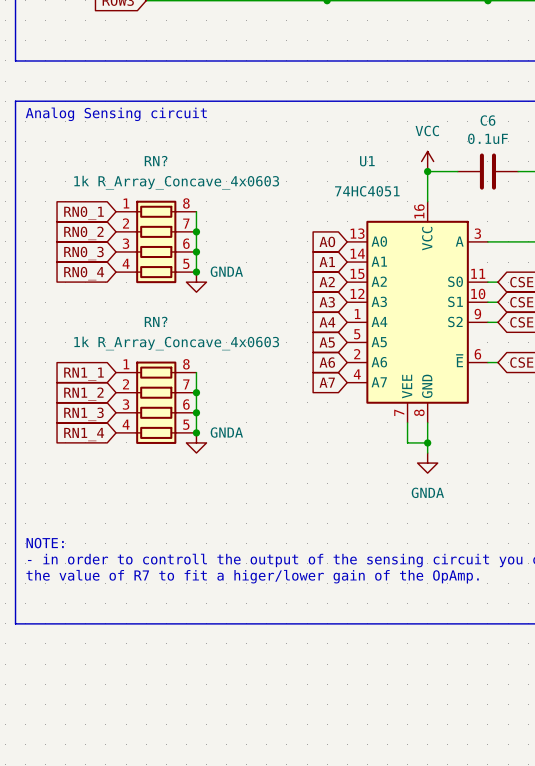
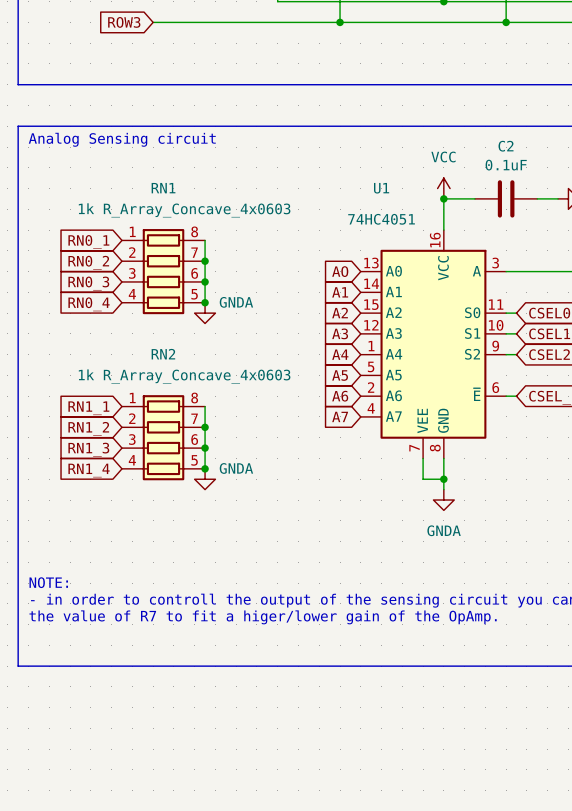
C6 name: C6 (487, 120) -> C2 (506, 146)
RN? name: RN? (156, 161) -> RN1 (163, 188)
RN? name: RN? (156, 321) -> RN2 (163, 354)

